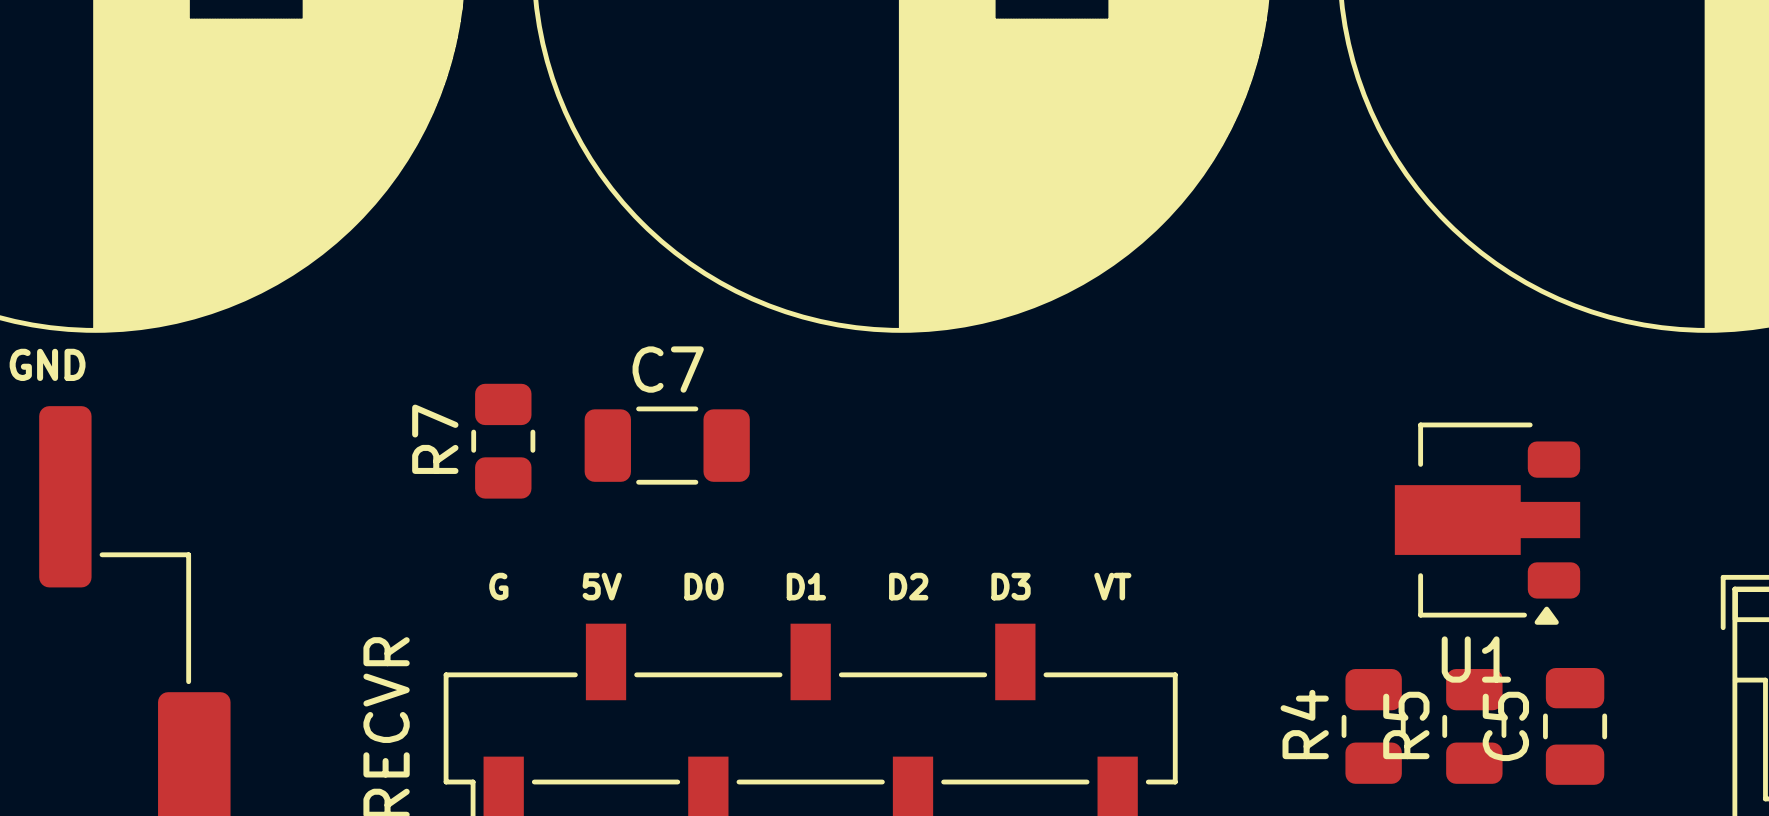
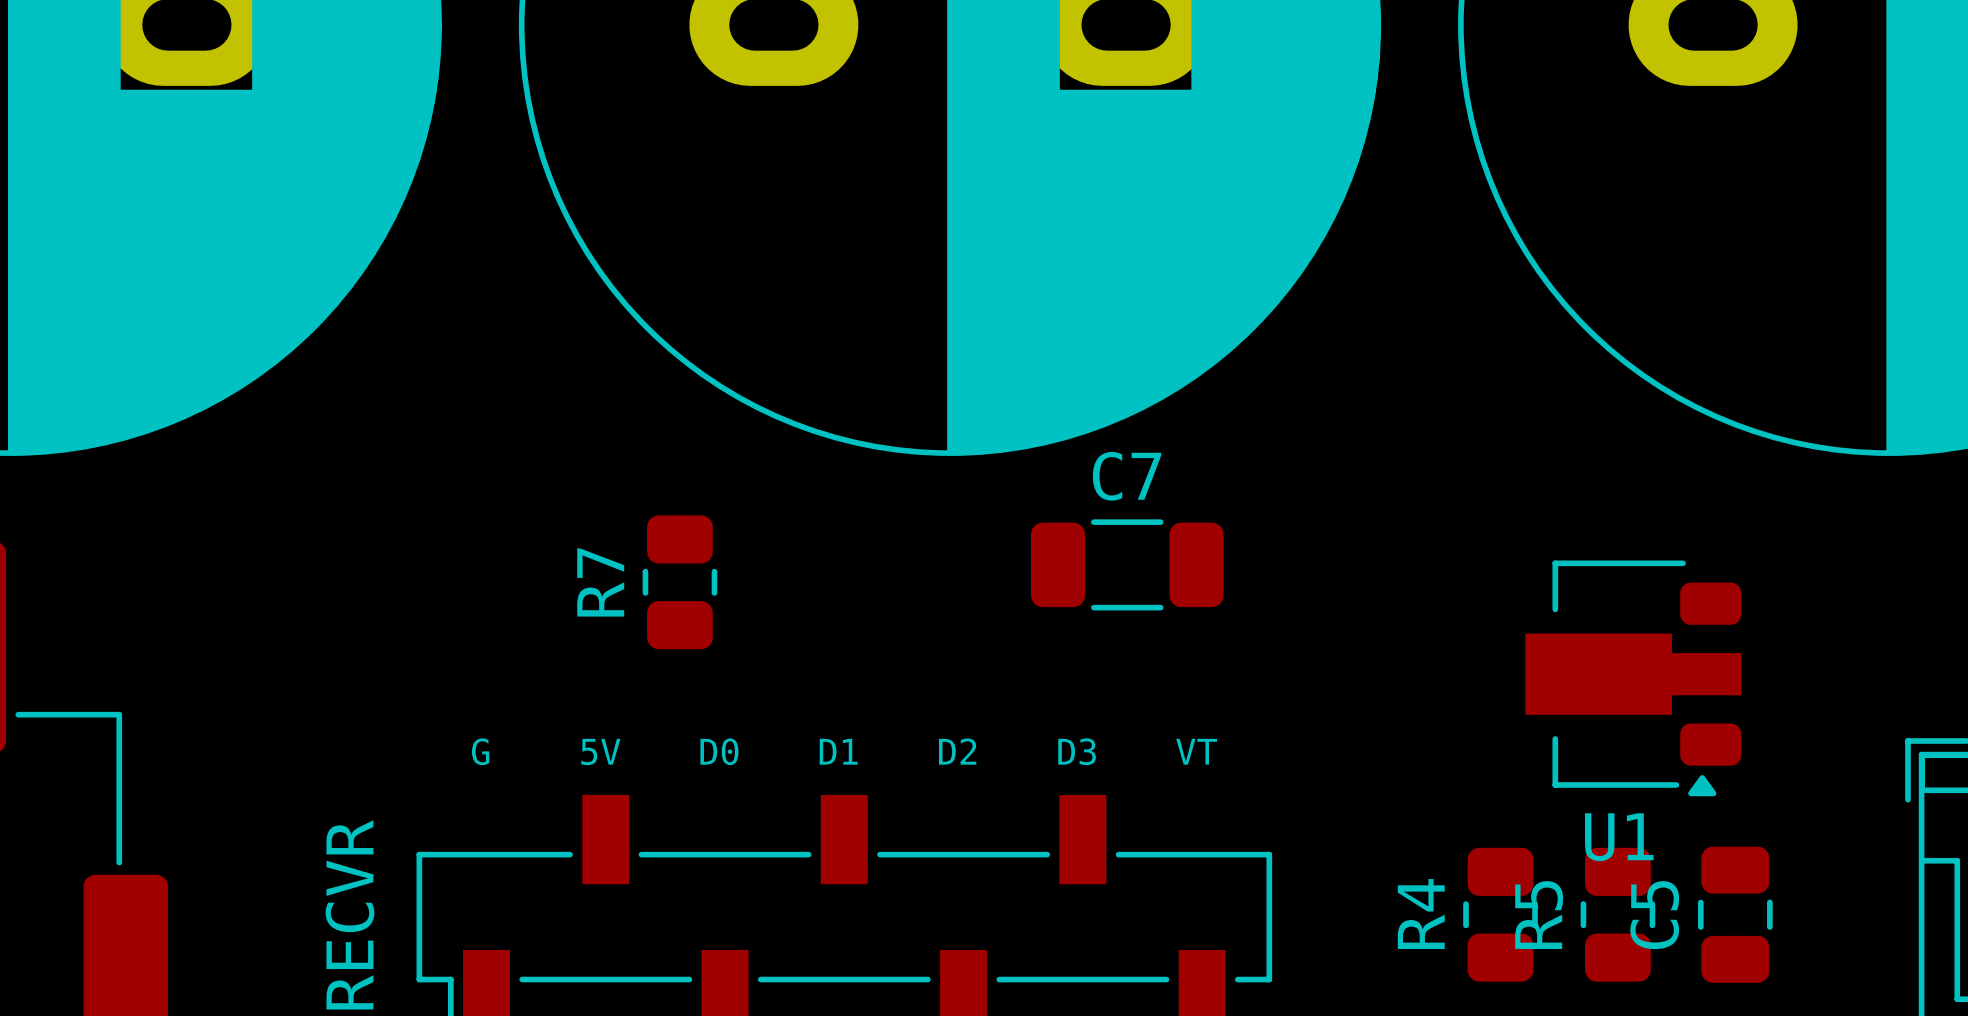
R7 position: (503, 441) -> (679, 582)
C7 position: (667, 445) -> (1127, 564)

